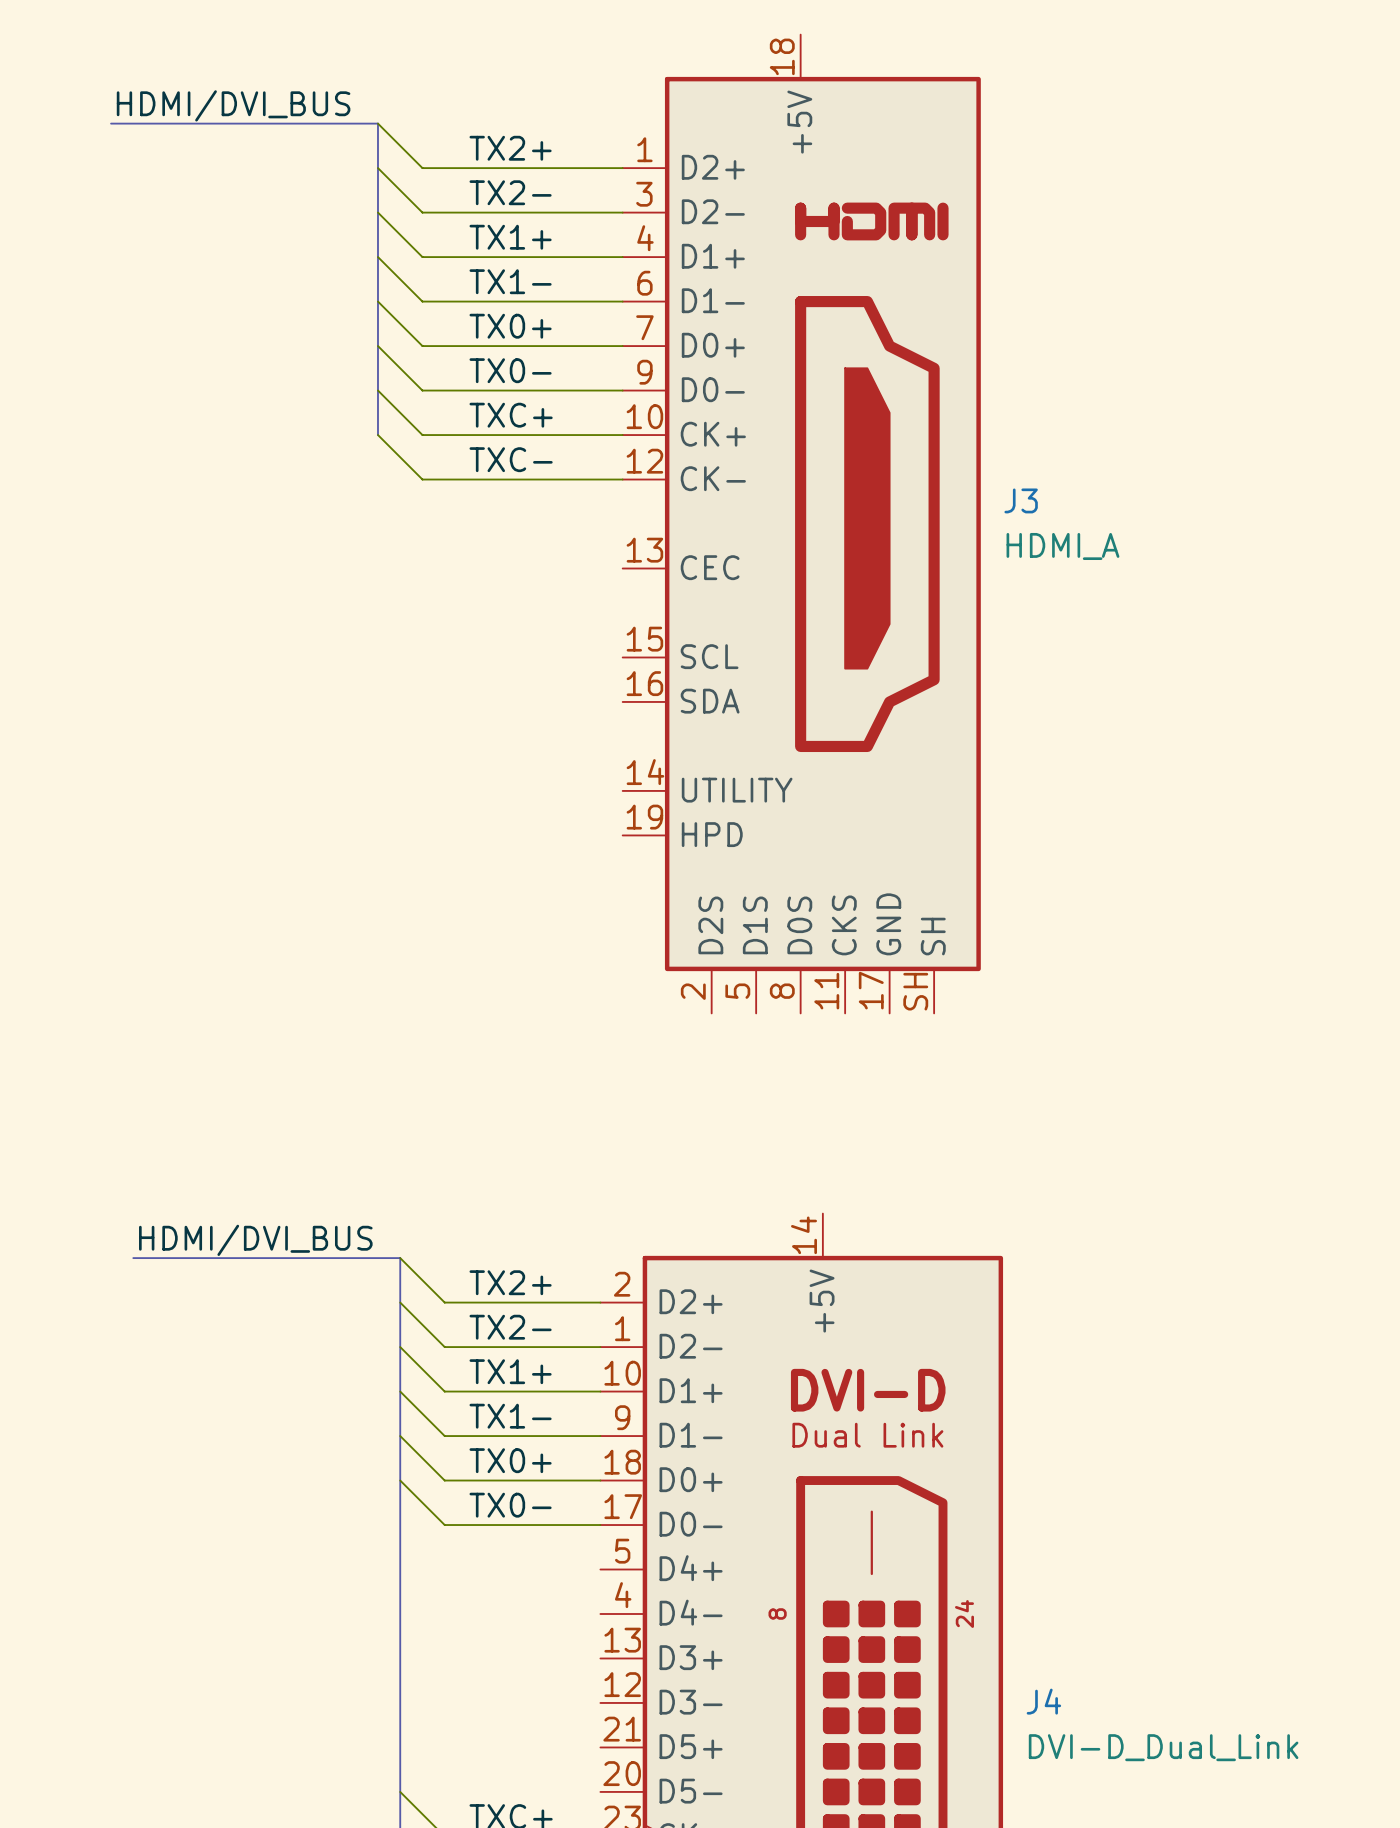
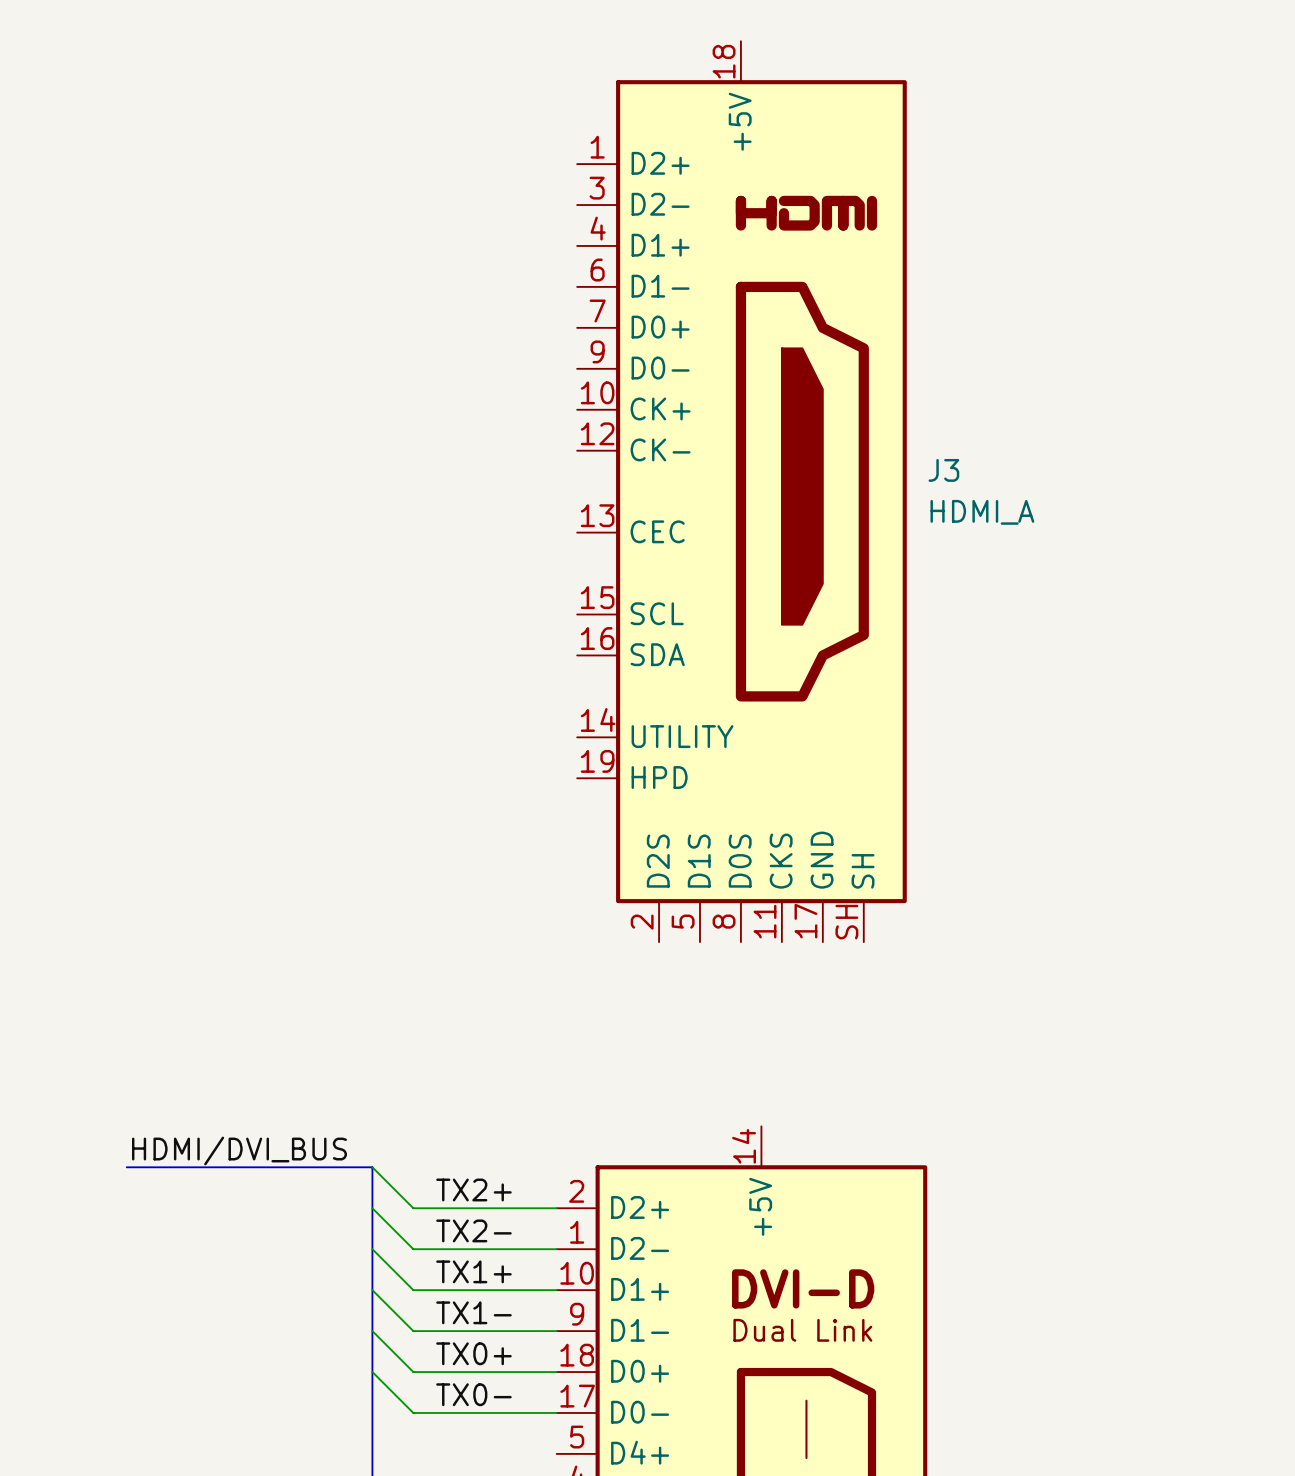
label: HDMI/DVI_BUS (233, 105) -> none
bus: (111, 123) (377, 123) (377, 435) -> none
wire: (377, 123) (422, 168) (622, 168) -> none
label: TX2+ (510, 148) -> none
wire: (377, 168) (422, 212) (622, 212) -> none
label: TX2- (510, 192) -> none
wire: (377, 212) (422, 257) (622, 257) -> none
label: TX1+ (510, 237) -> none
wire: (377, 257) (422, 301) (622, 301) -> none
label: TX1- (510, 281) -> none
wire: (377, 301) (422, 346) (622, 346) -> none
label: TX0+ (510, 326) -> none
wire: (377, 346) (422, 390) (622, 390) -> none
label: TX0- (510, 370) -> none
wire: (377, 390) (422, 435) (622, 435) -> none
label: TXC+ (511, 415) -> none
wire: (377, 435) (422, 479) (622, 479) -> none
label: TXC- (511, 459) -> none

